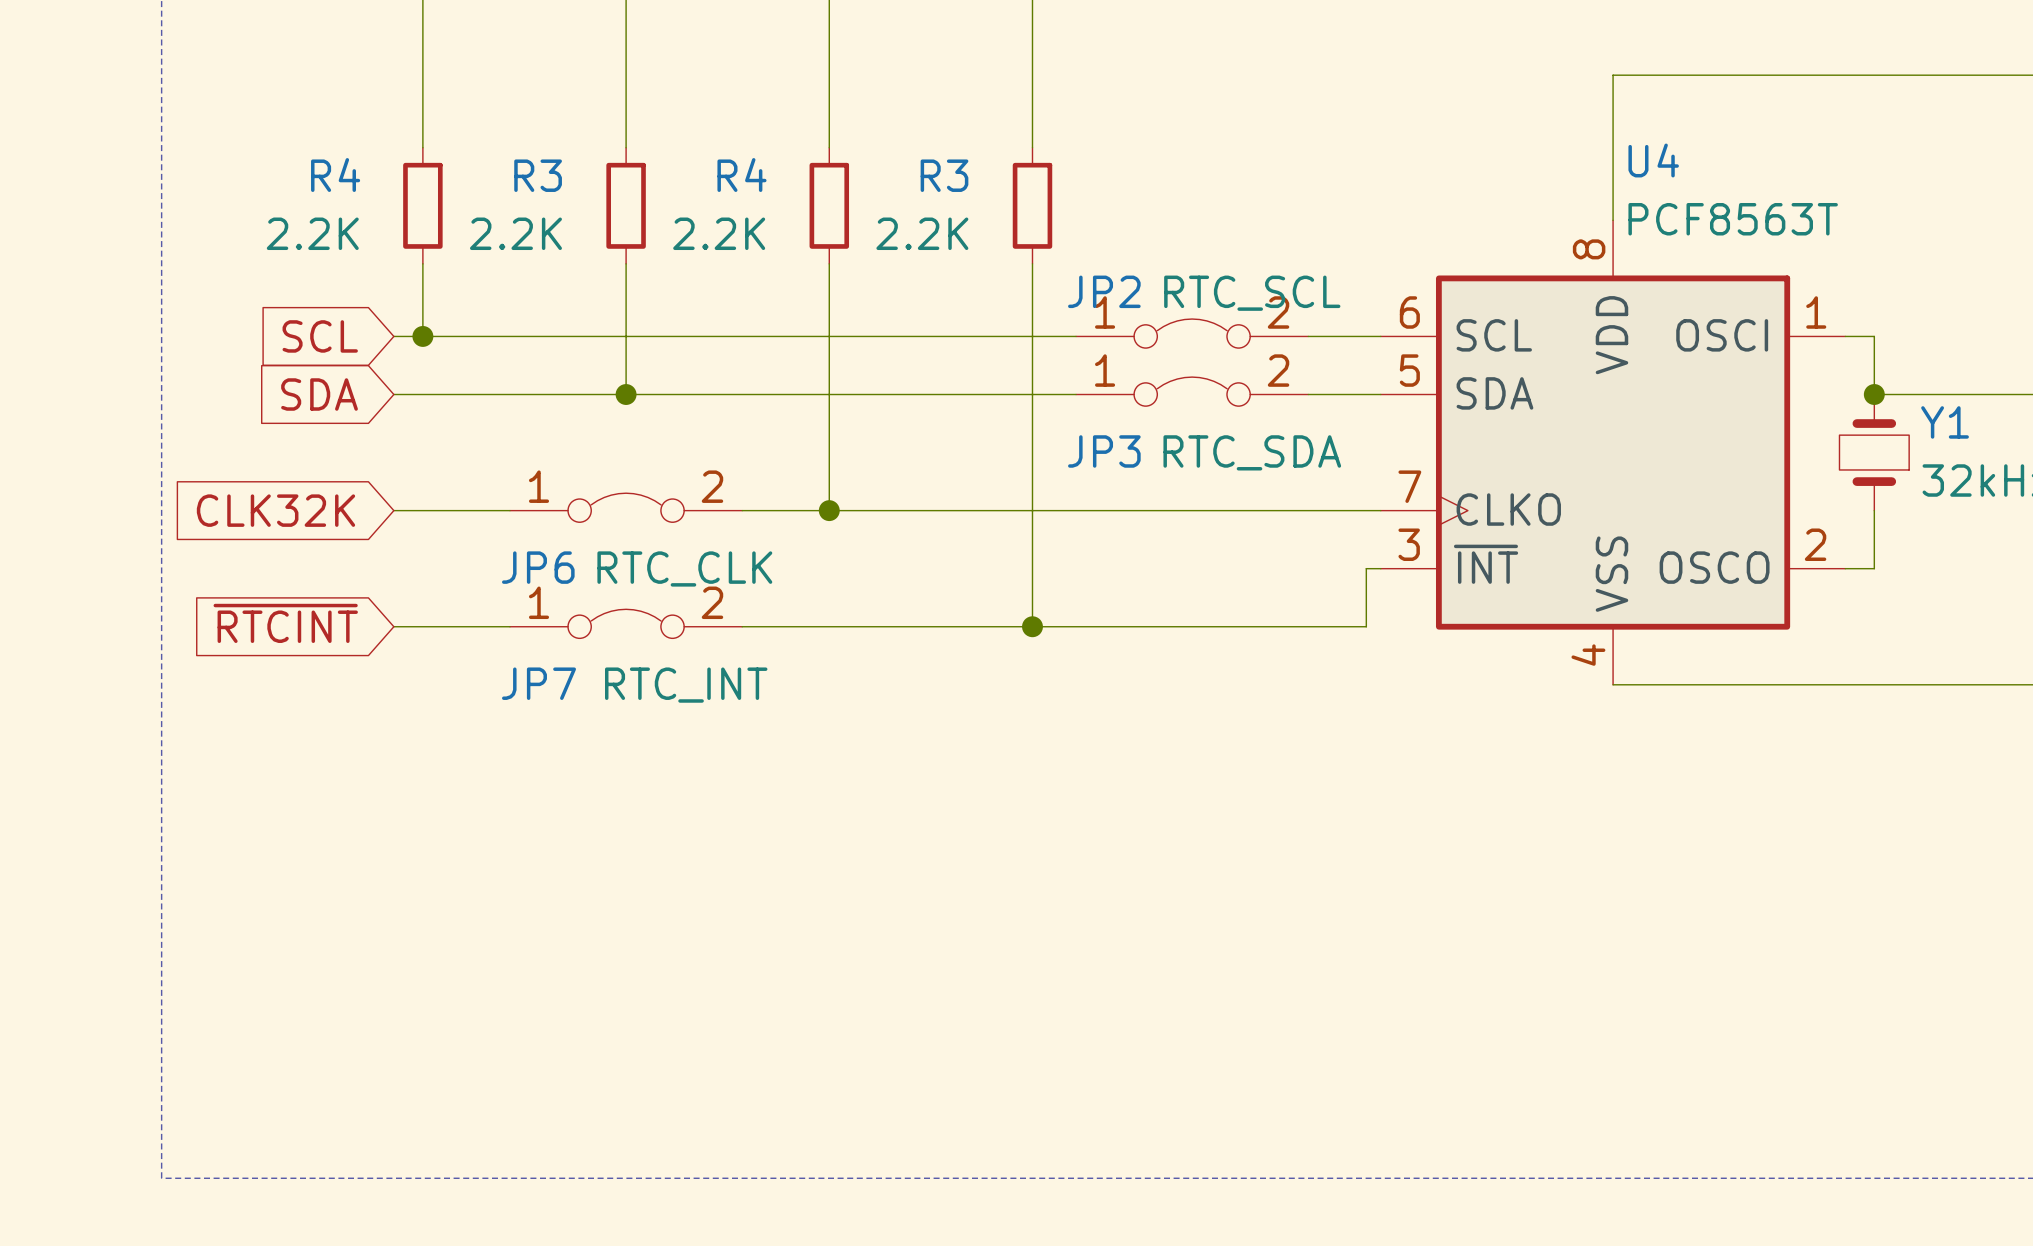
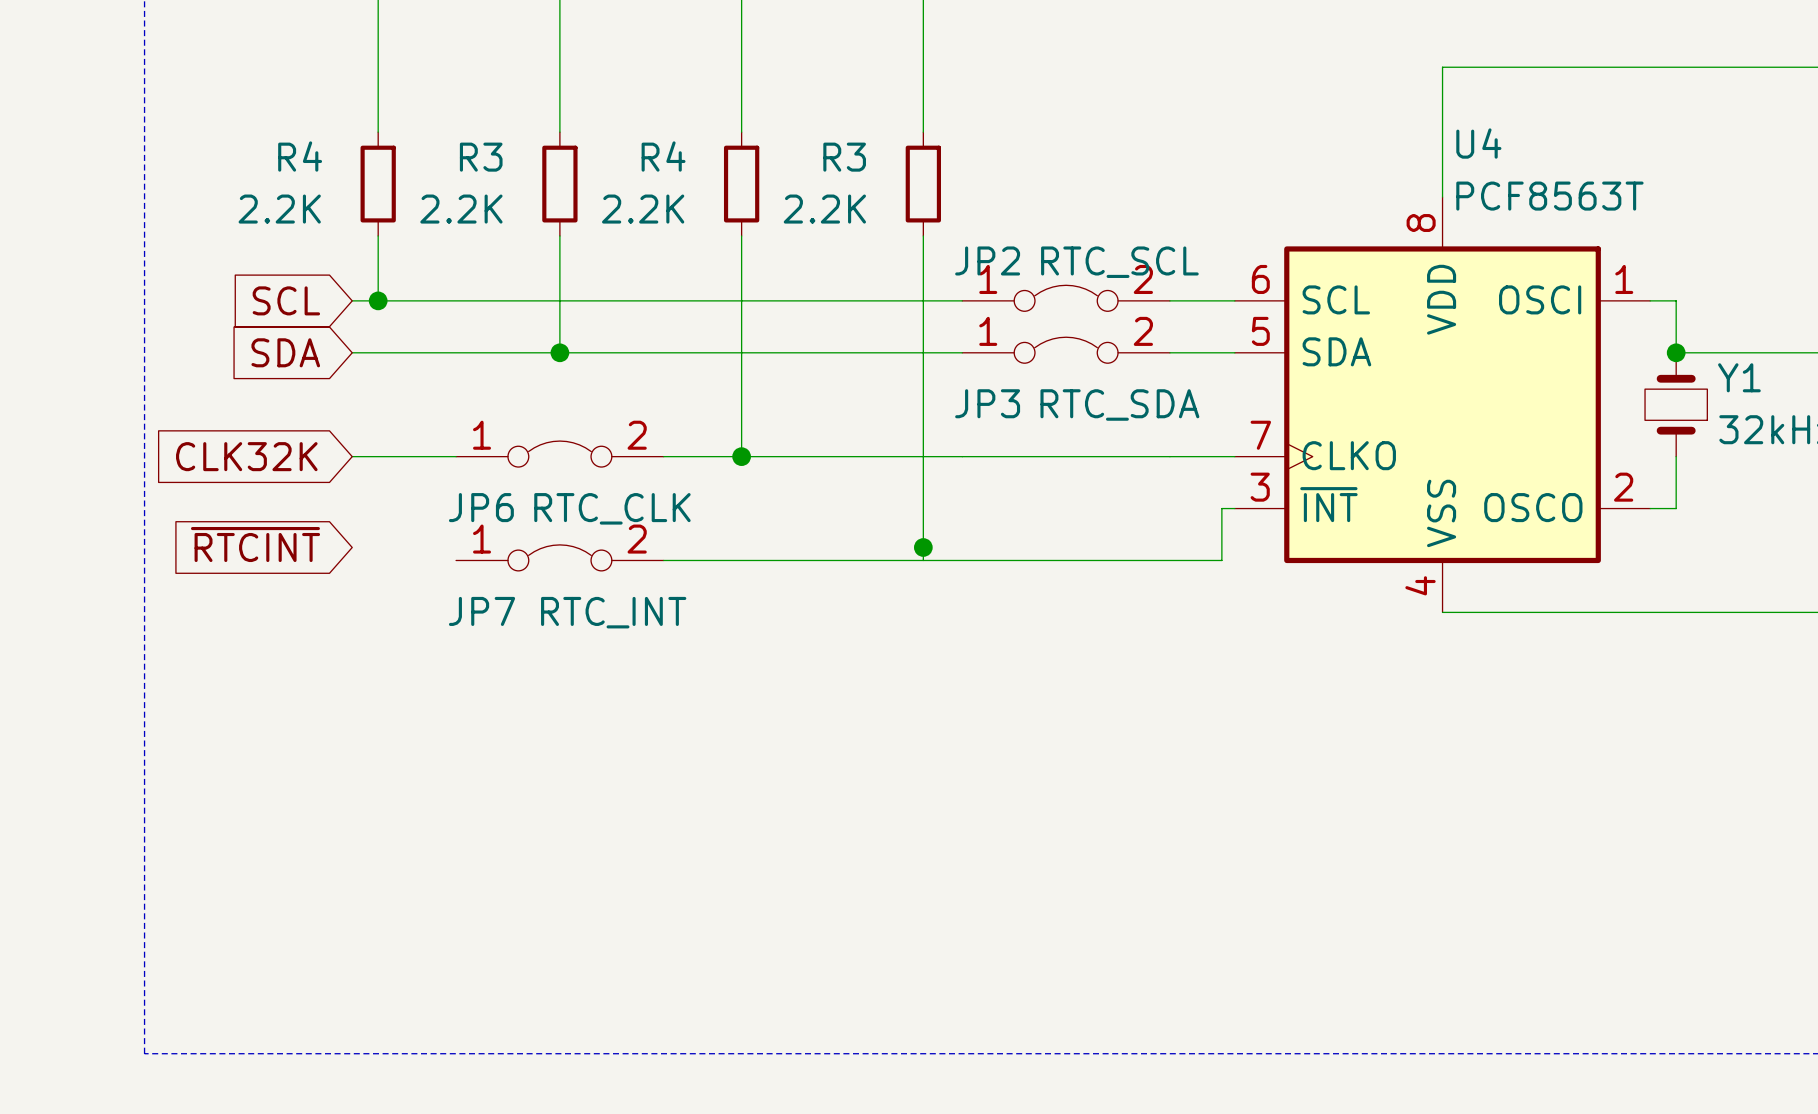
global label position: ~{RTCINT} (285, 623) -> ~{RTCINT} (255, 544)
wire: (393, 626) (509, 626) -> none
junction position: (1032, 626) -> (923, 547)

